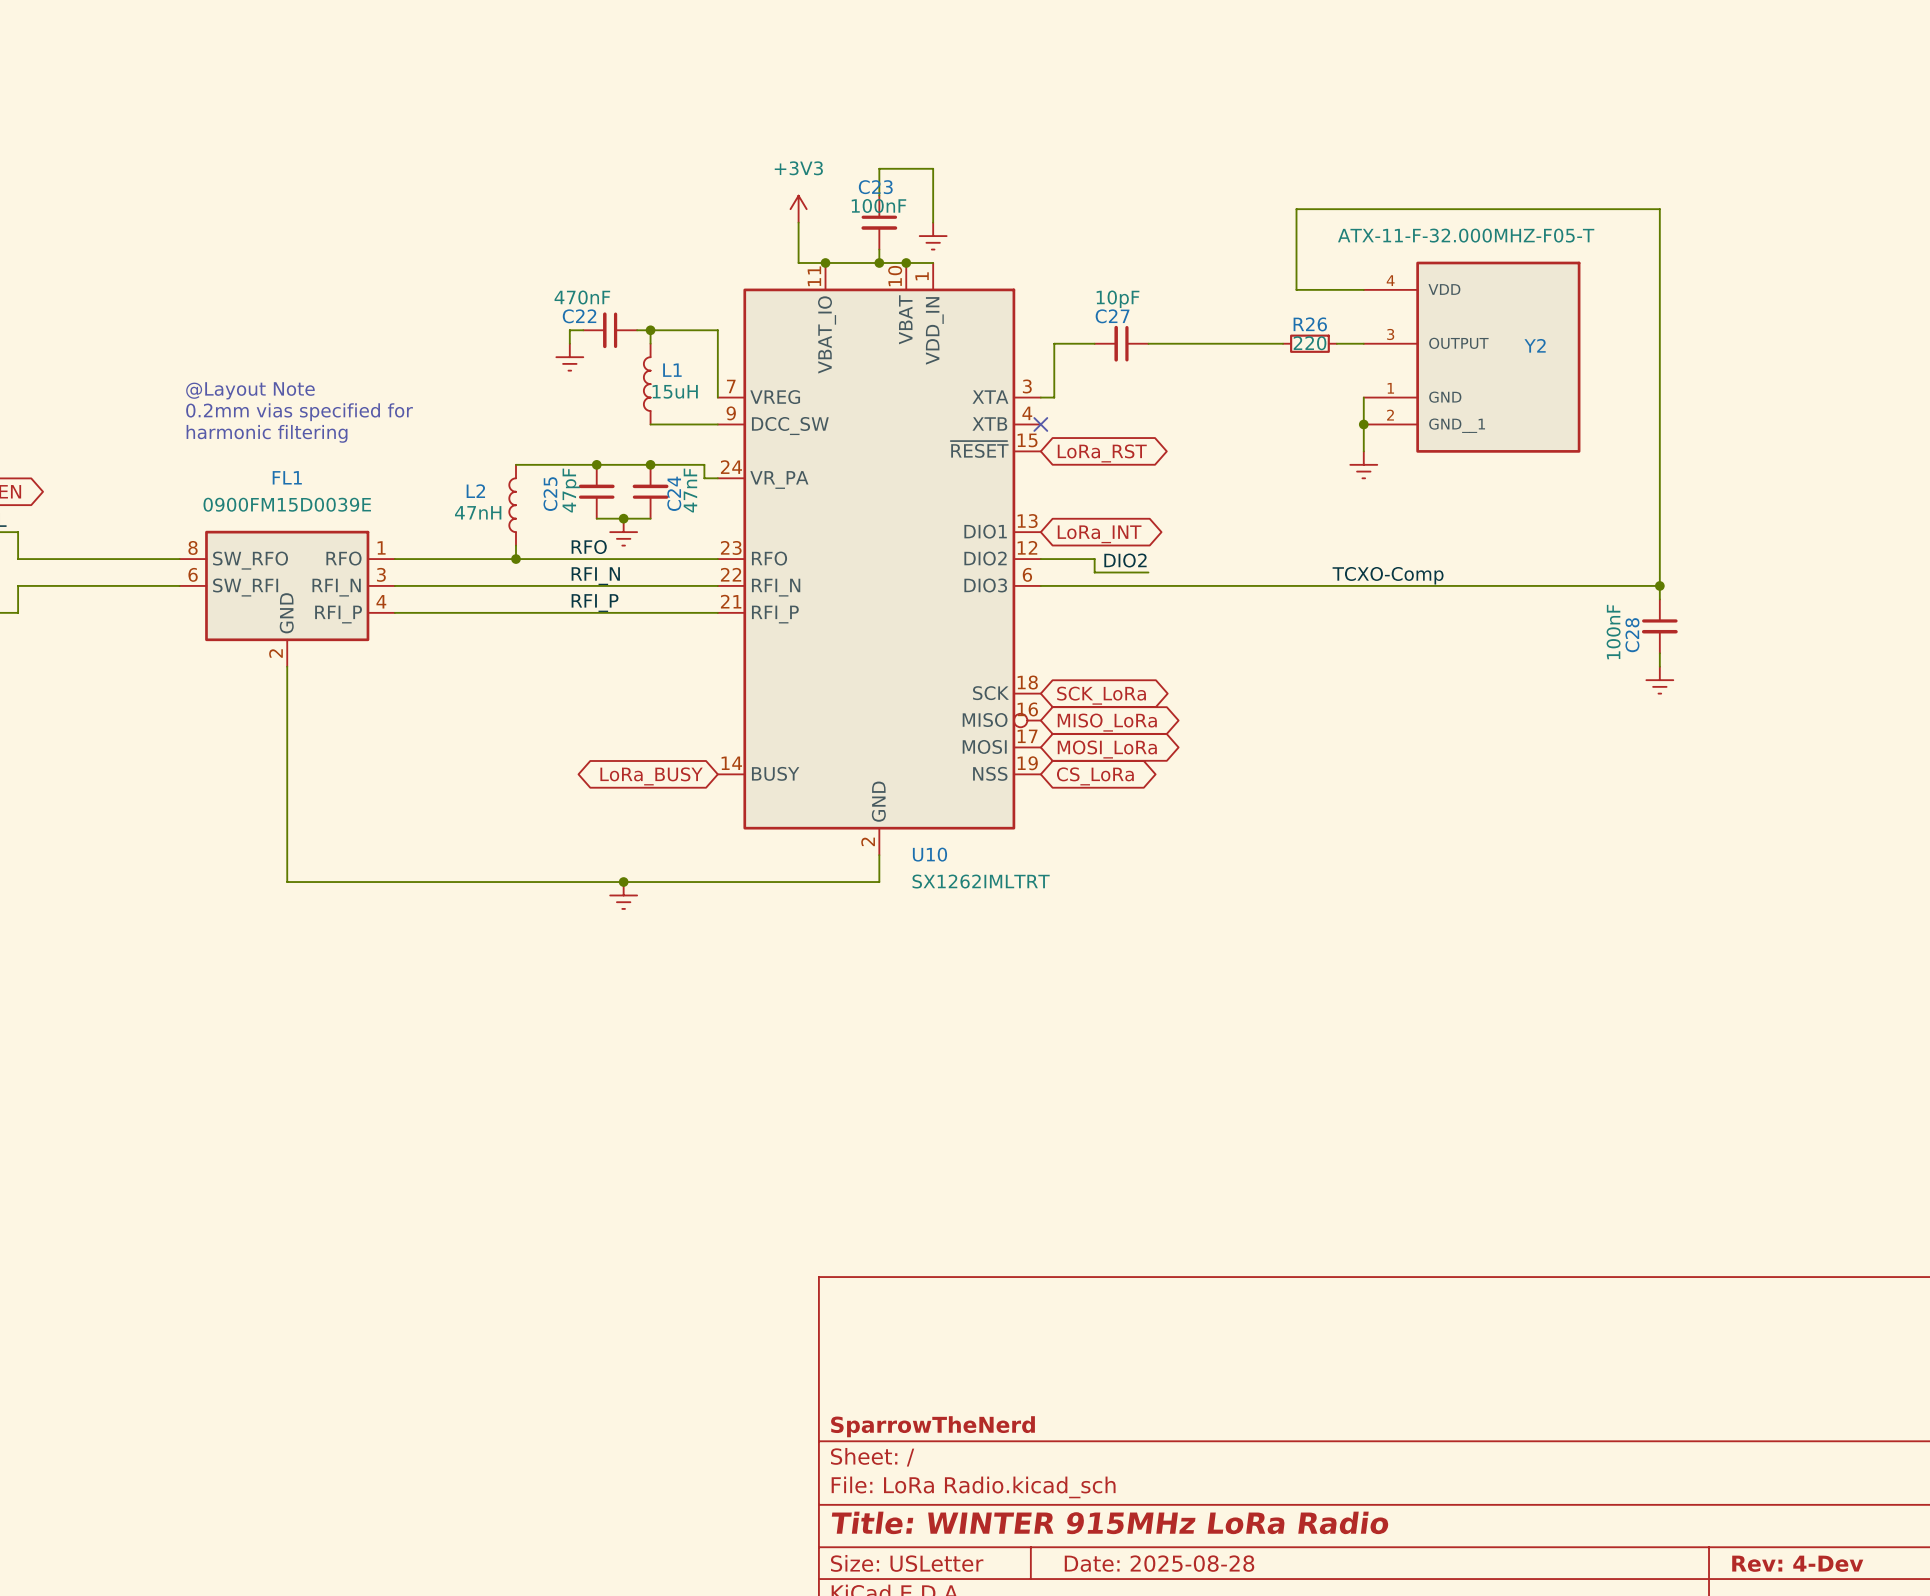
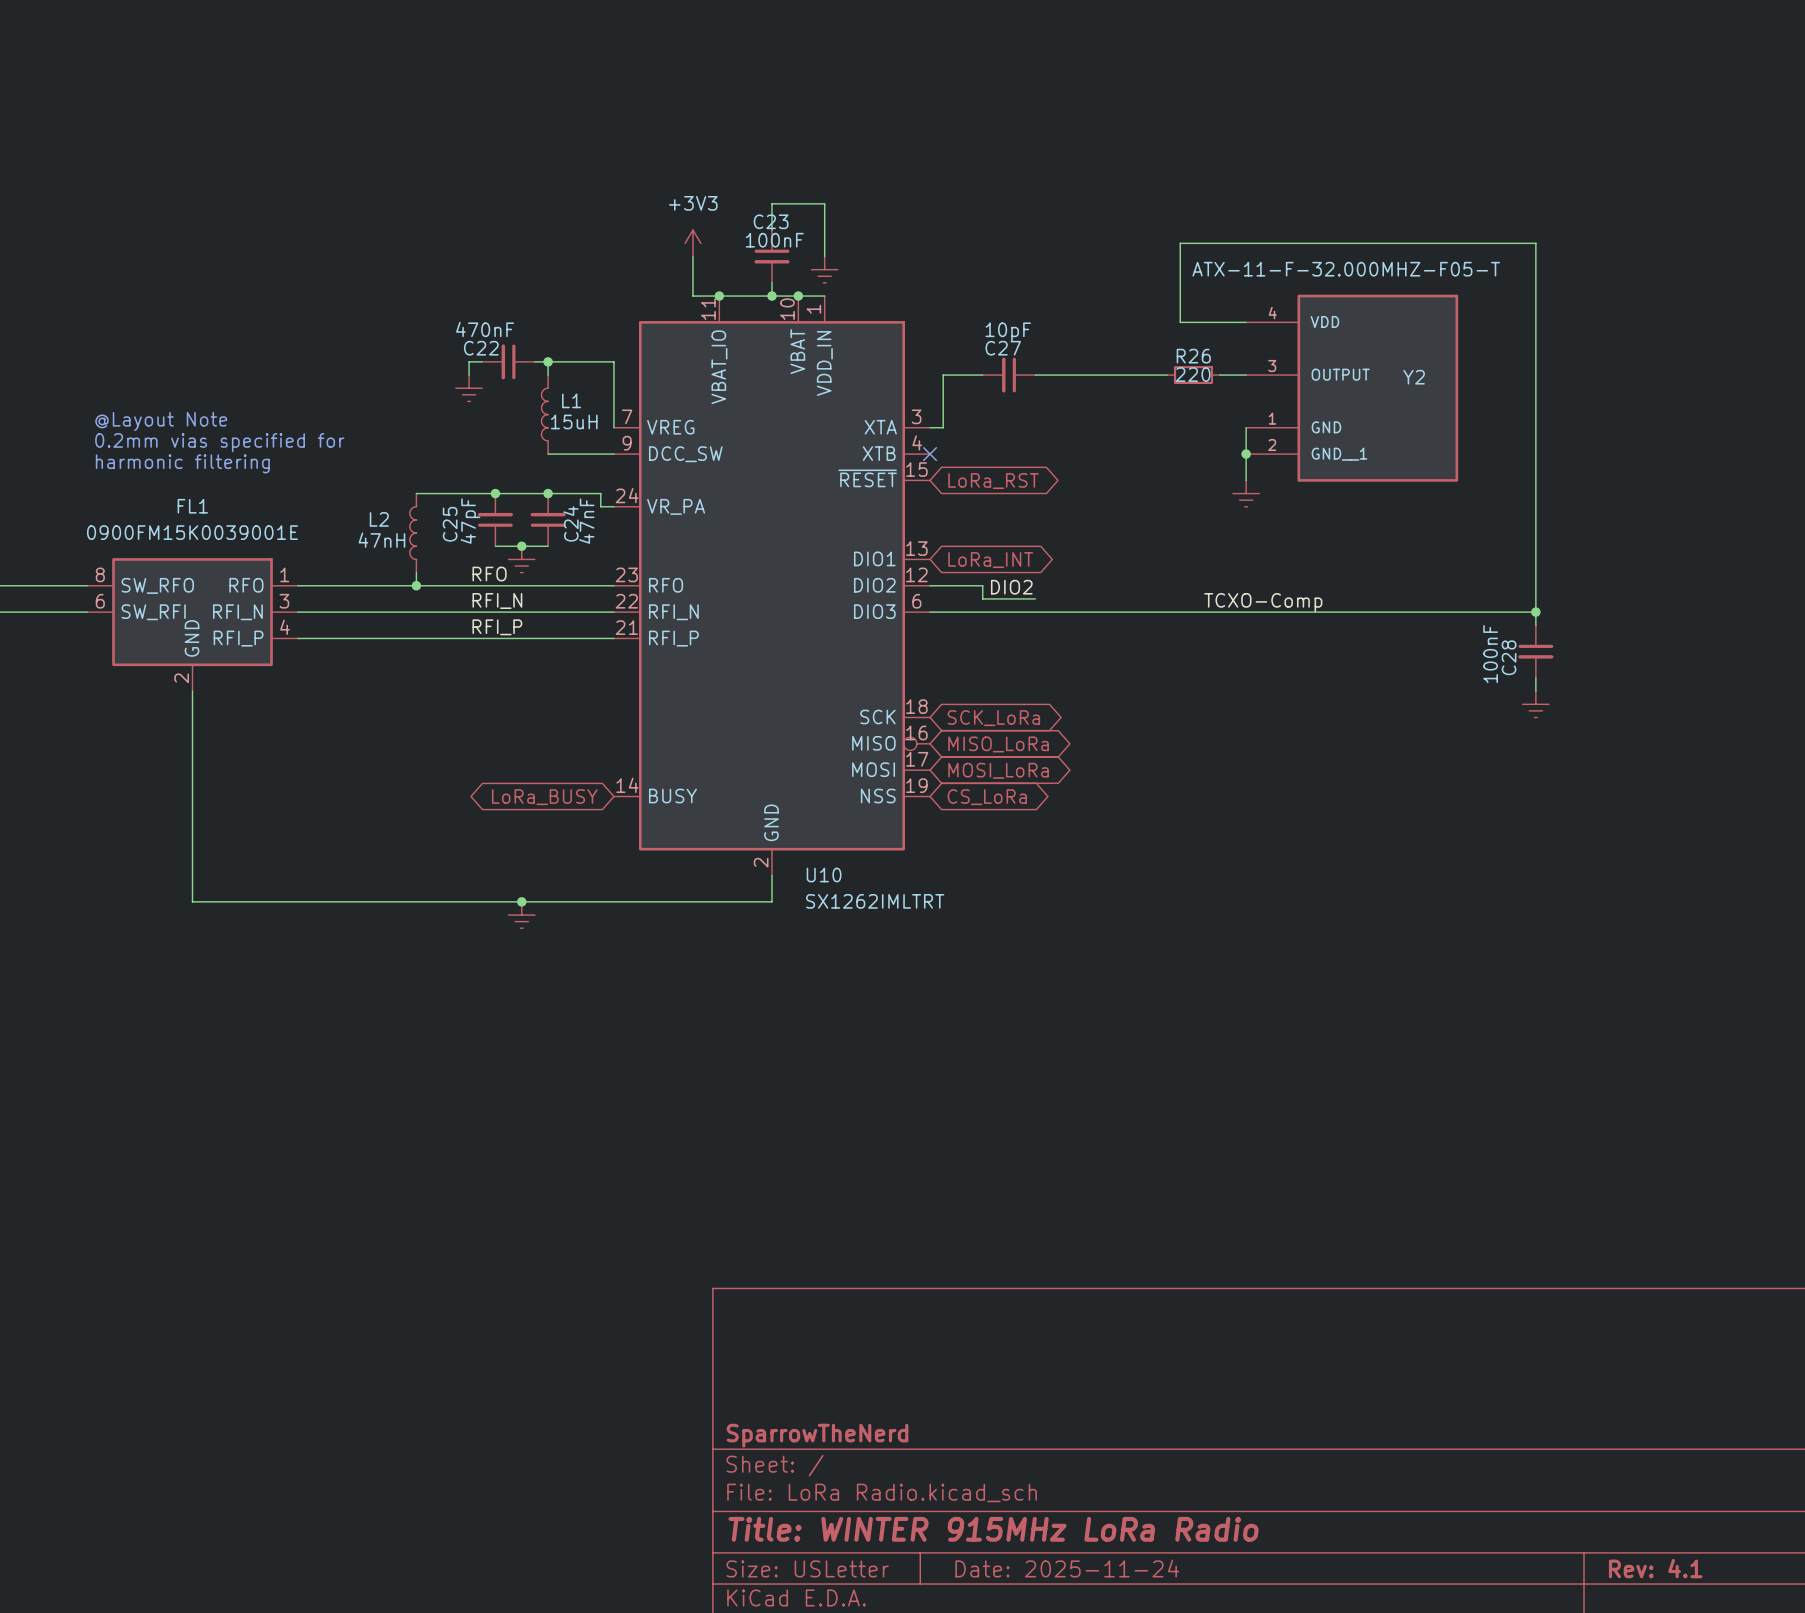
FL1 value: 0900FM15D0039E (287, 504) -> 0900FM15K0039001E (192, 532)
title block: Date: 2025-08-28 (1159, 1563) -> Date: 2025-11-24 (1067, 1568)
title block: Rev: 4-Dev (1797, 1563) -> Rev: 4.1 (1655, 1568)

